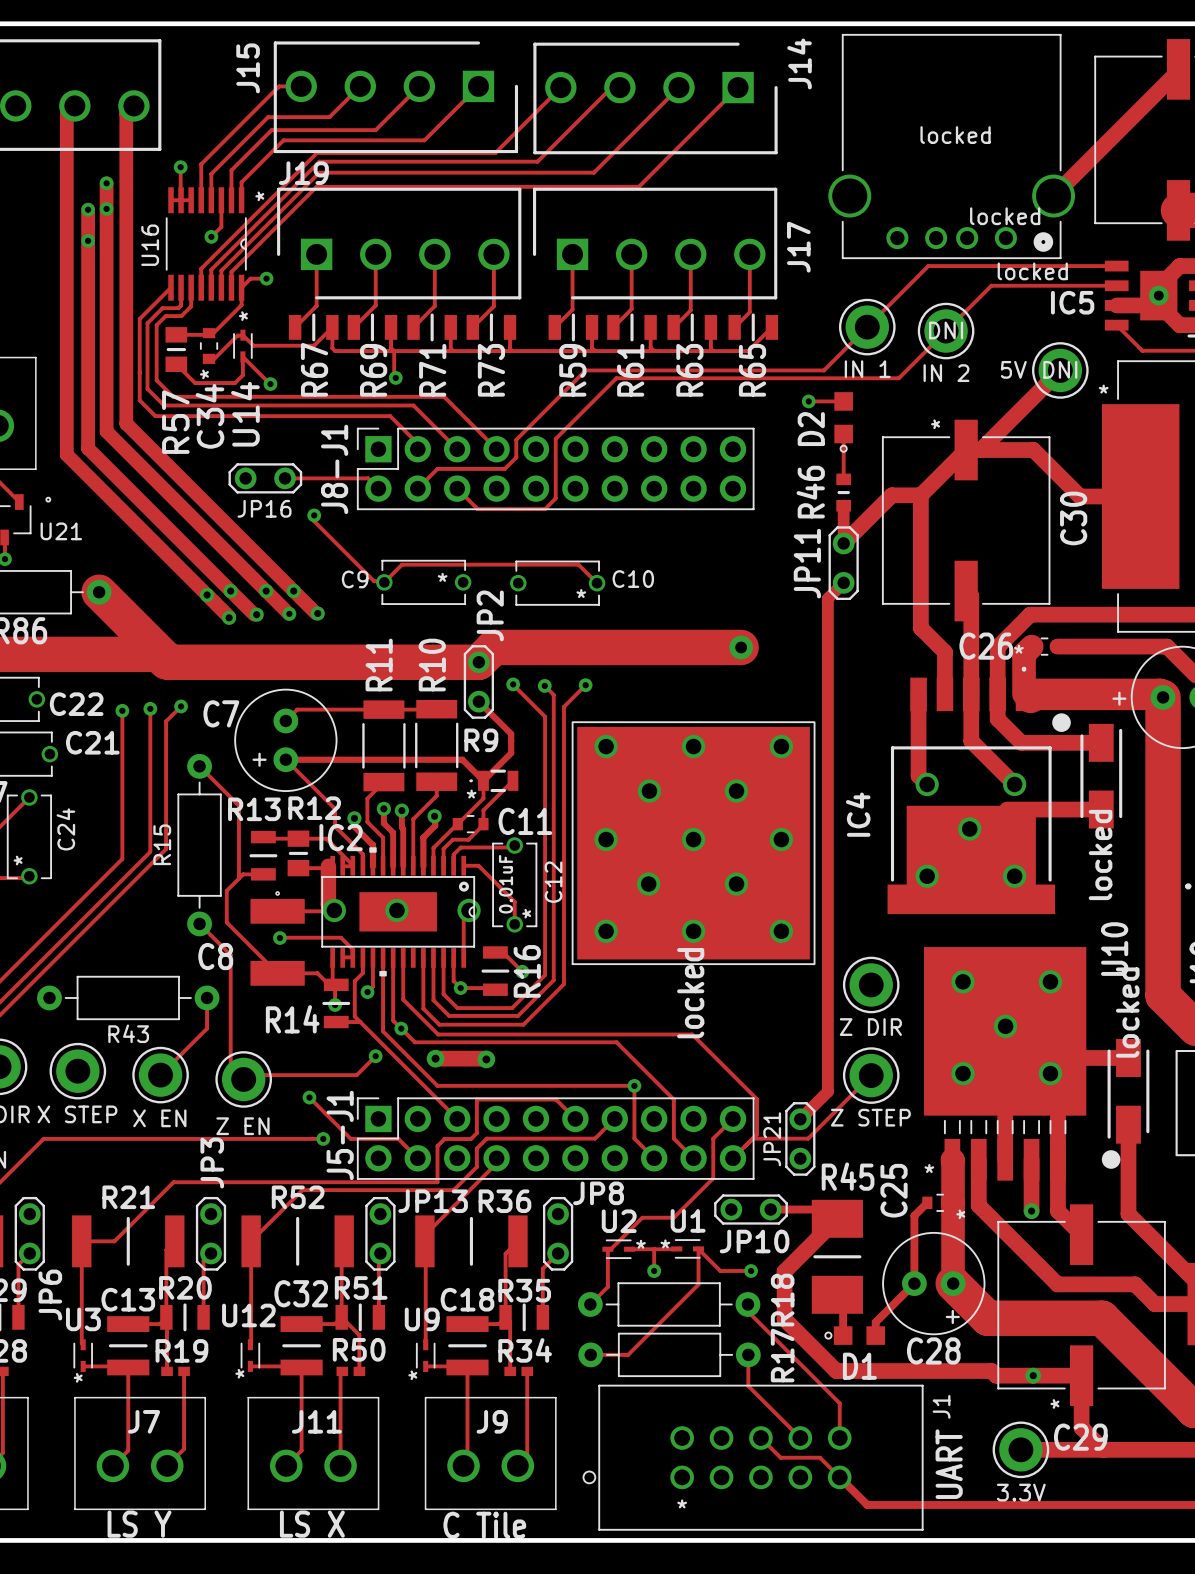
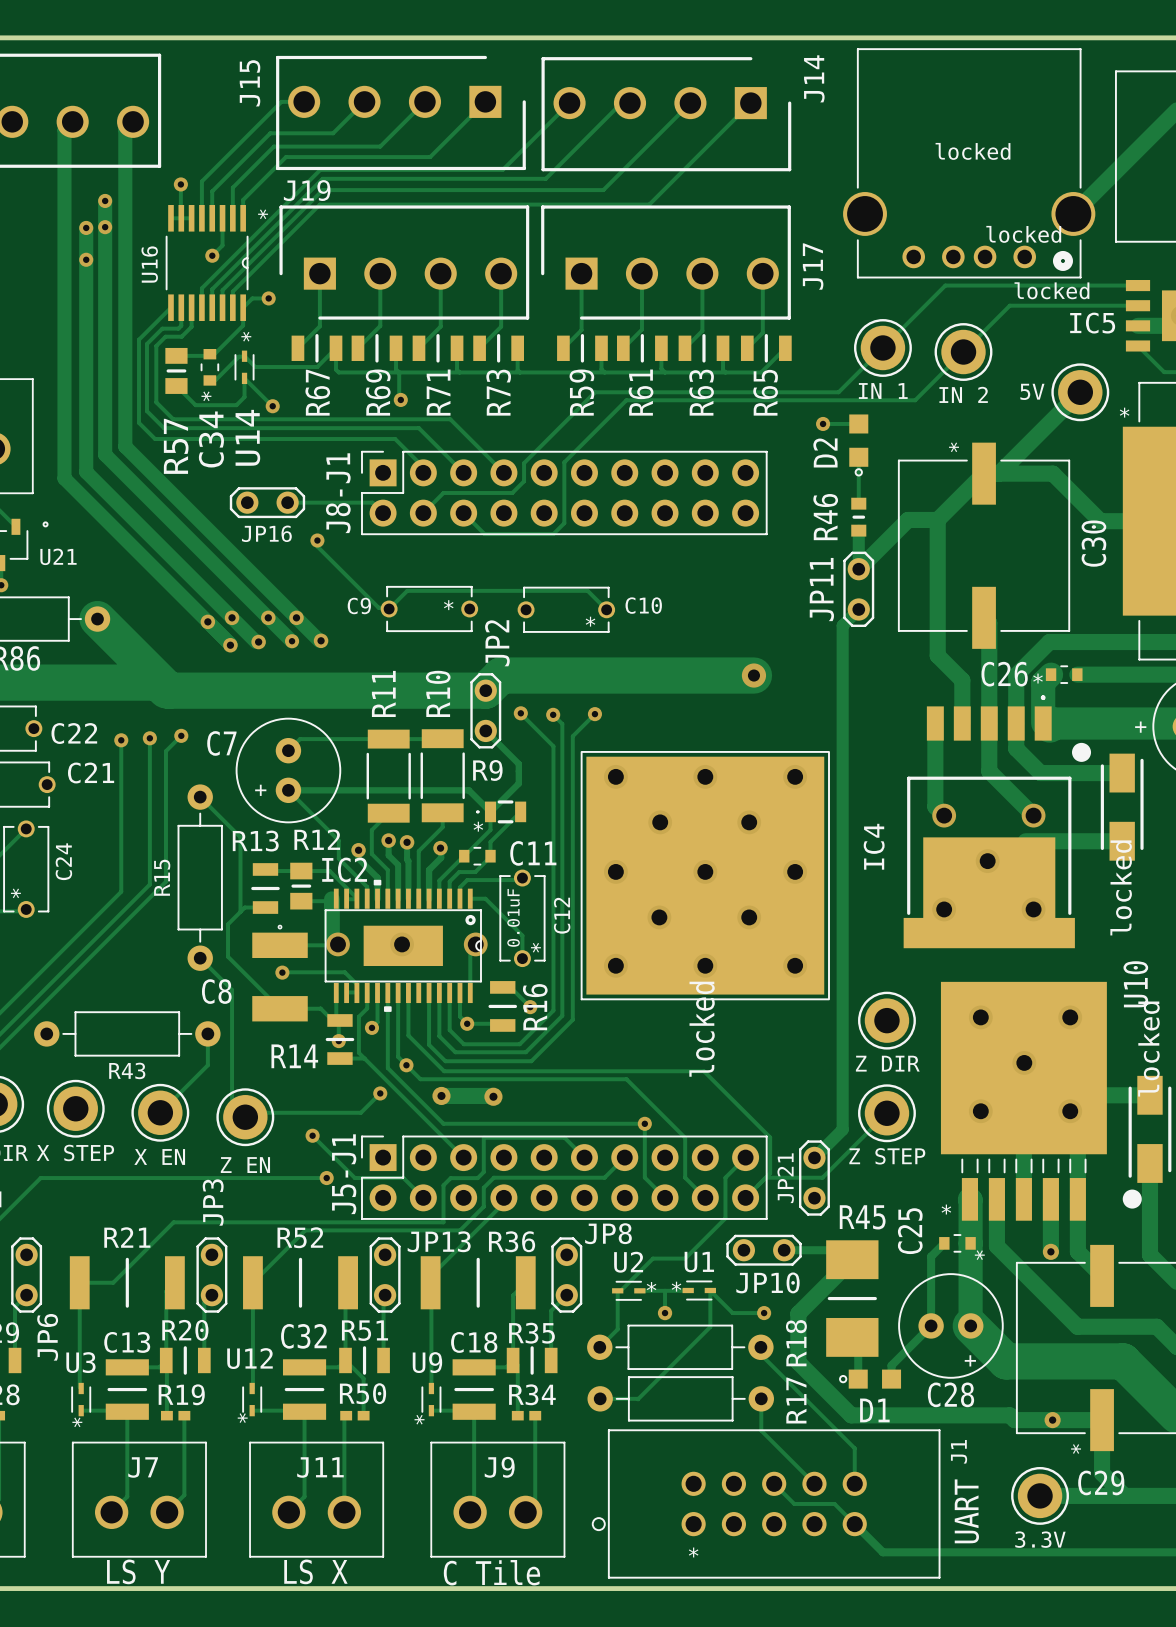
DNI name: DNI (946, 330) -> none
DNI name: DNI (1060, 369) -> none

